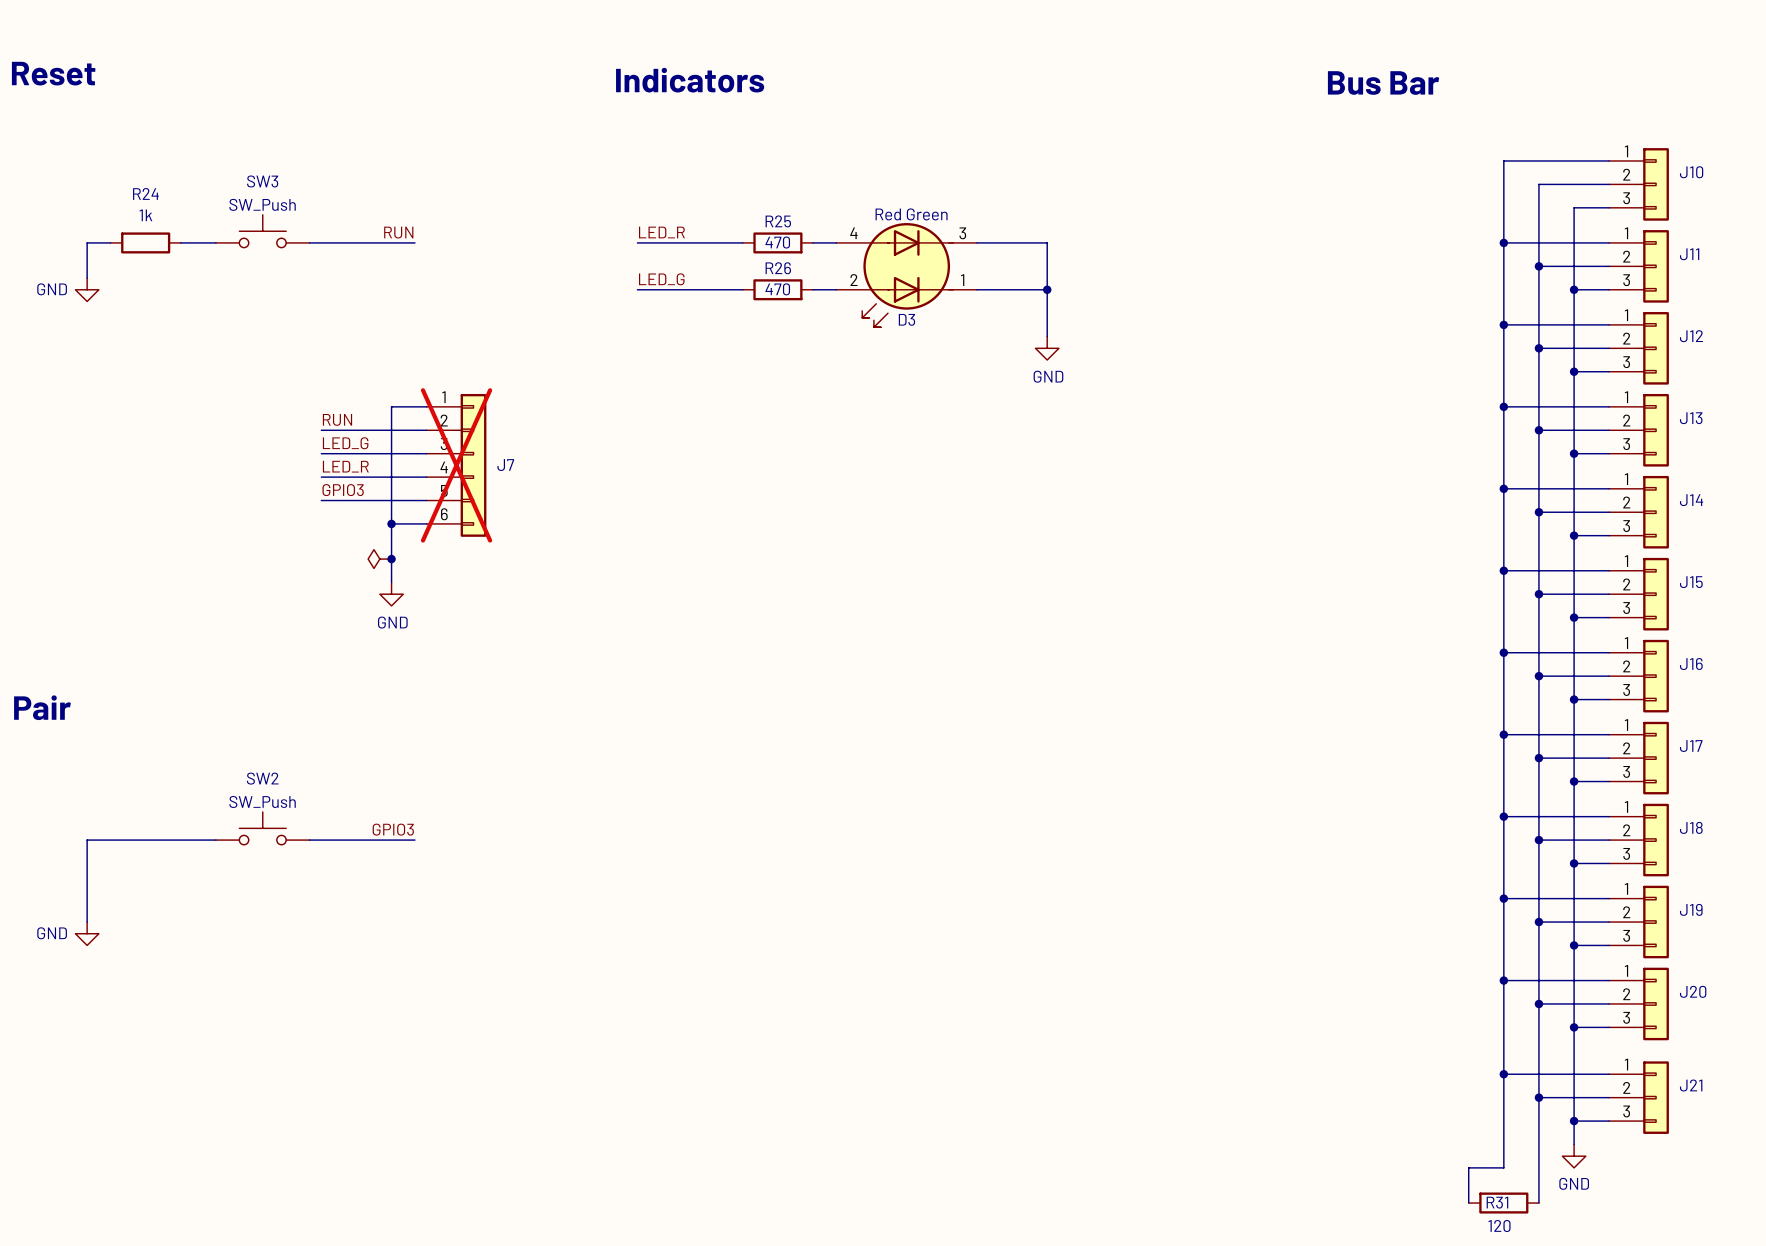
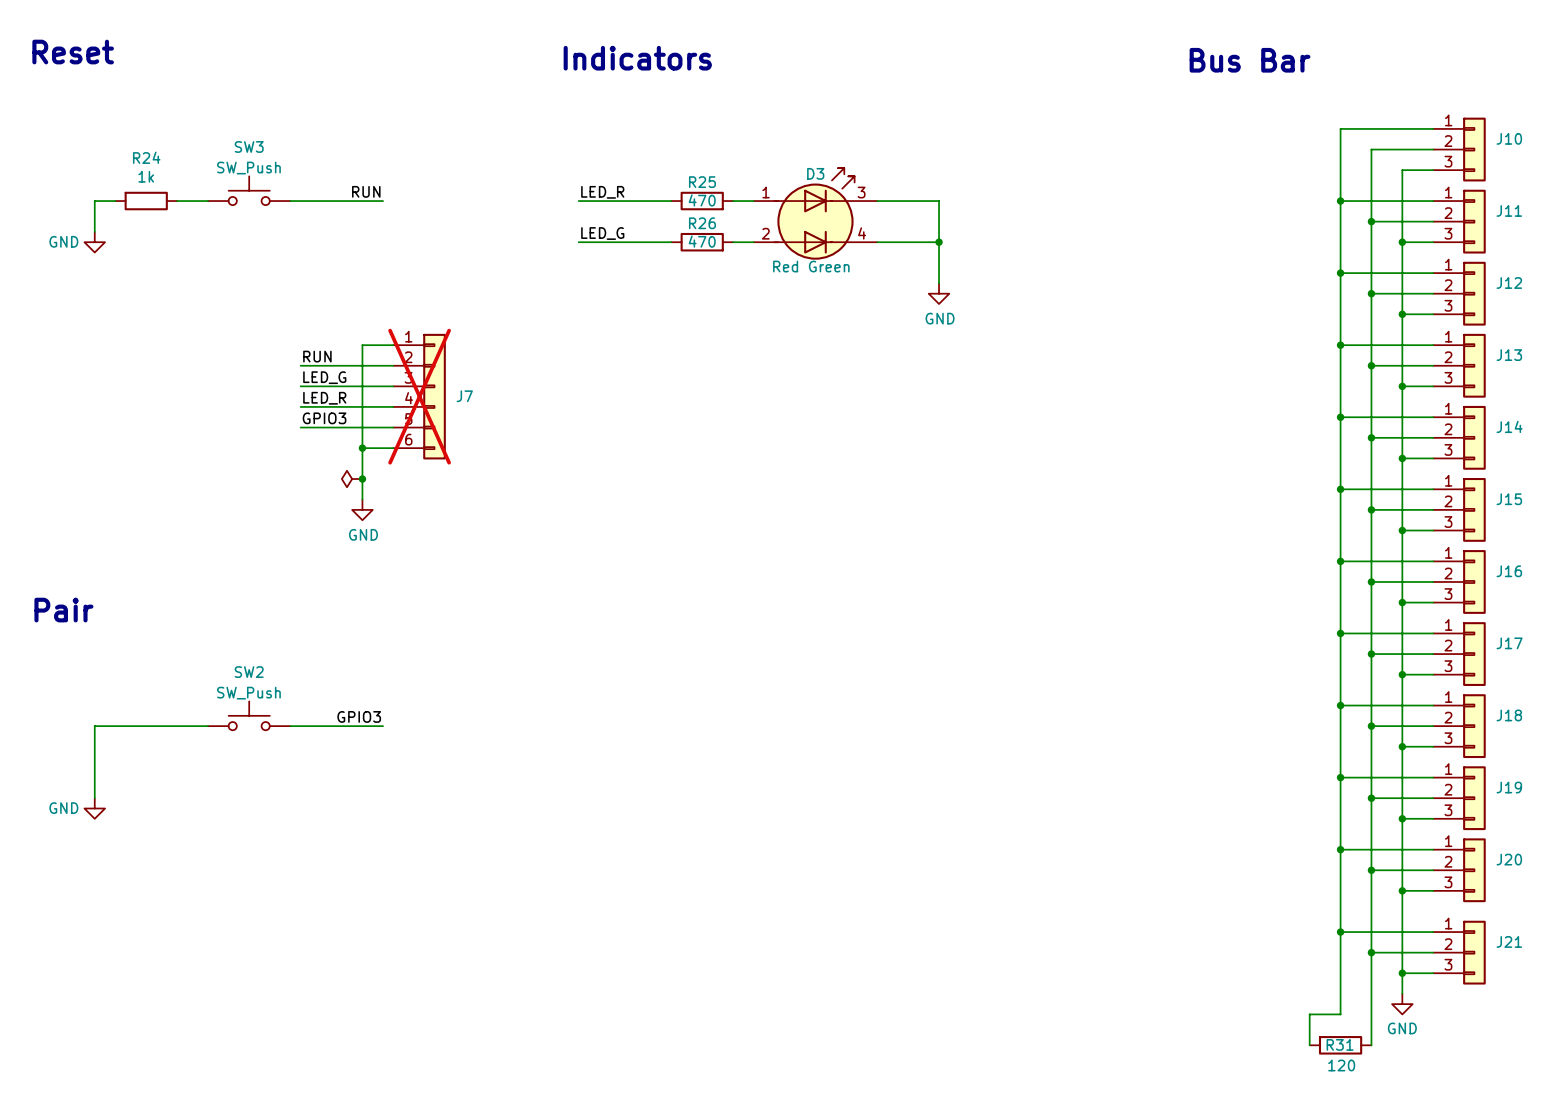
D3 value position: Red Green (911, 214) -> Red Green (811, 266)
D3 symbol: [836, 223, 977, 328] -> [753, 168, 878, 260]
D3 name position: D3 (906, 319) -> D3 (815, 173)

